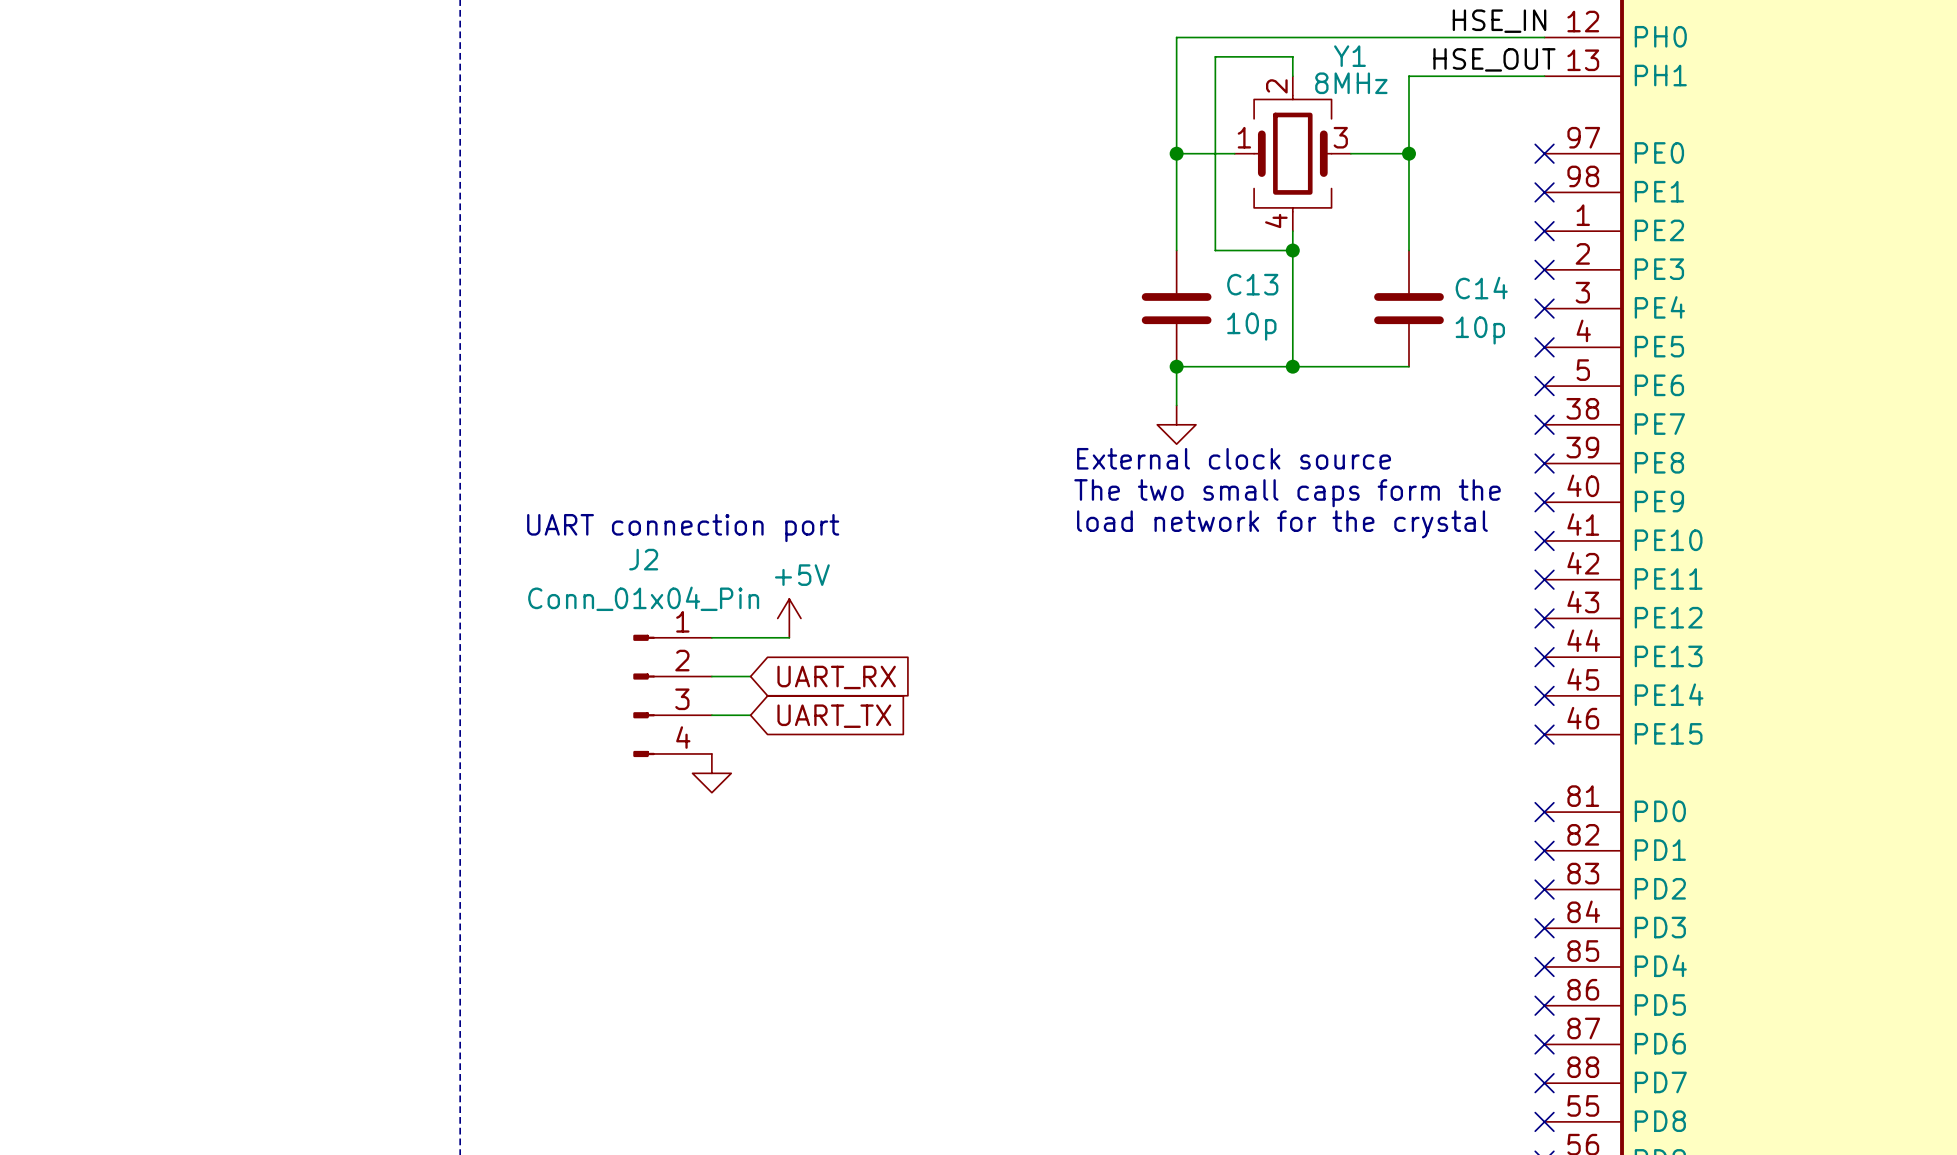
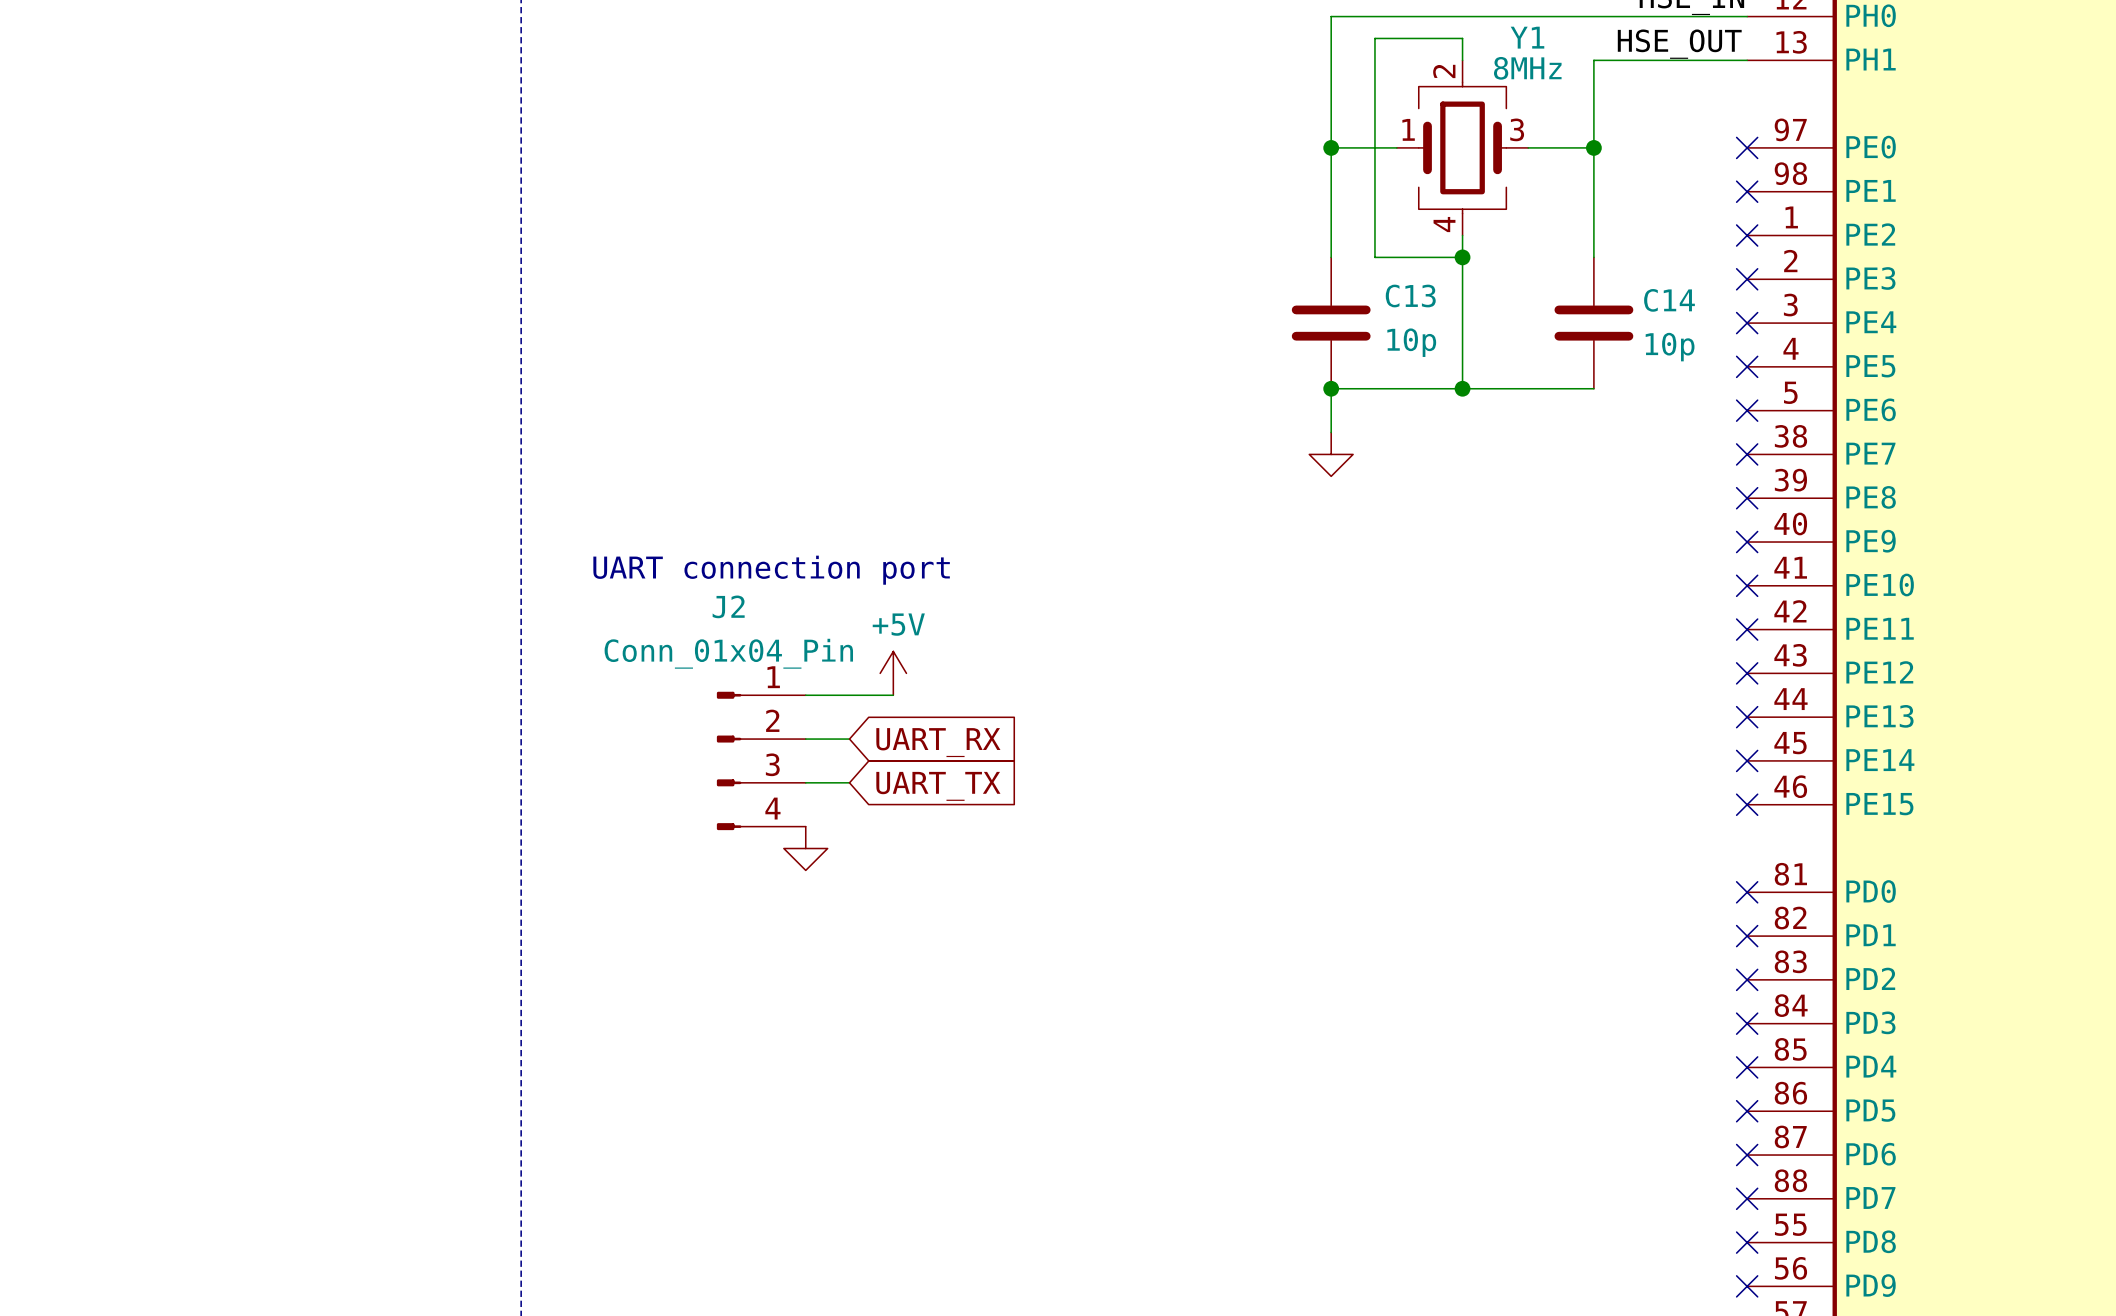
text: External clock source (1234, 458) -> none
text: The two small caps form the (1287, 493) -> none
text: load network for the crystal (1282, 524) -> none

